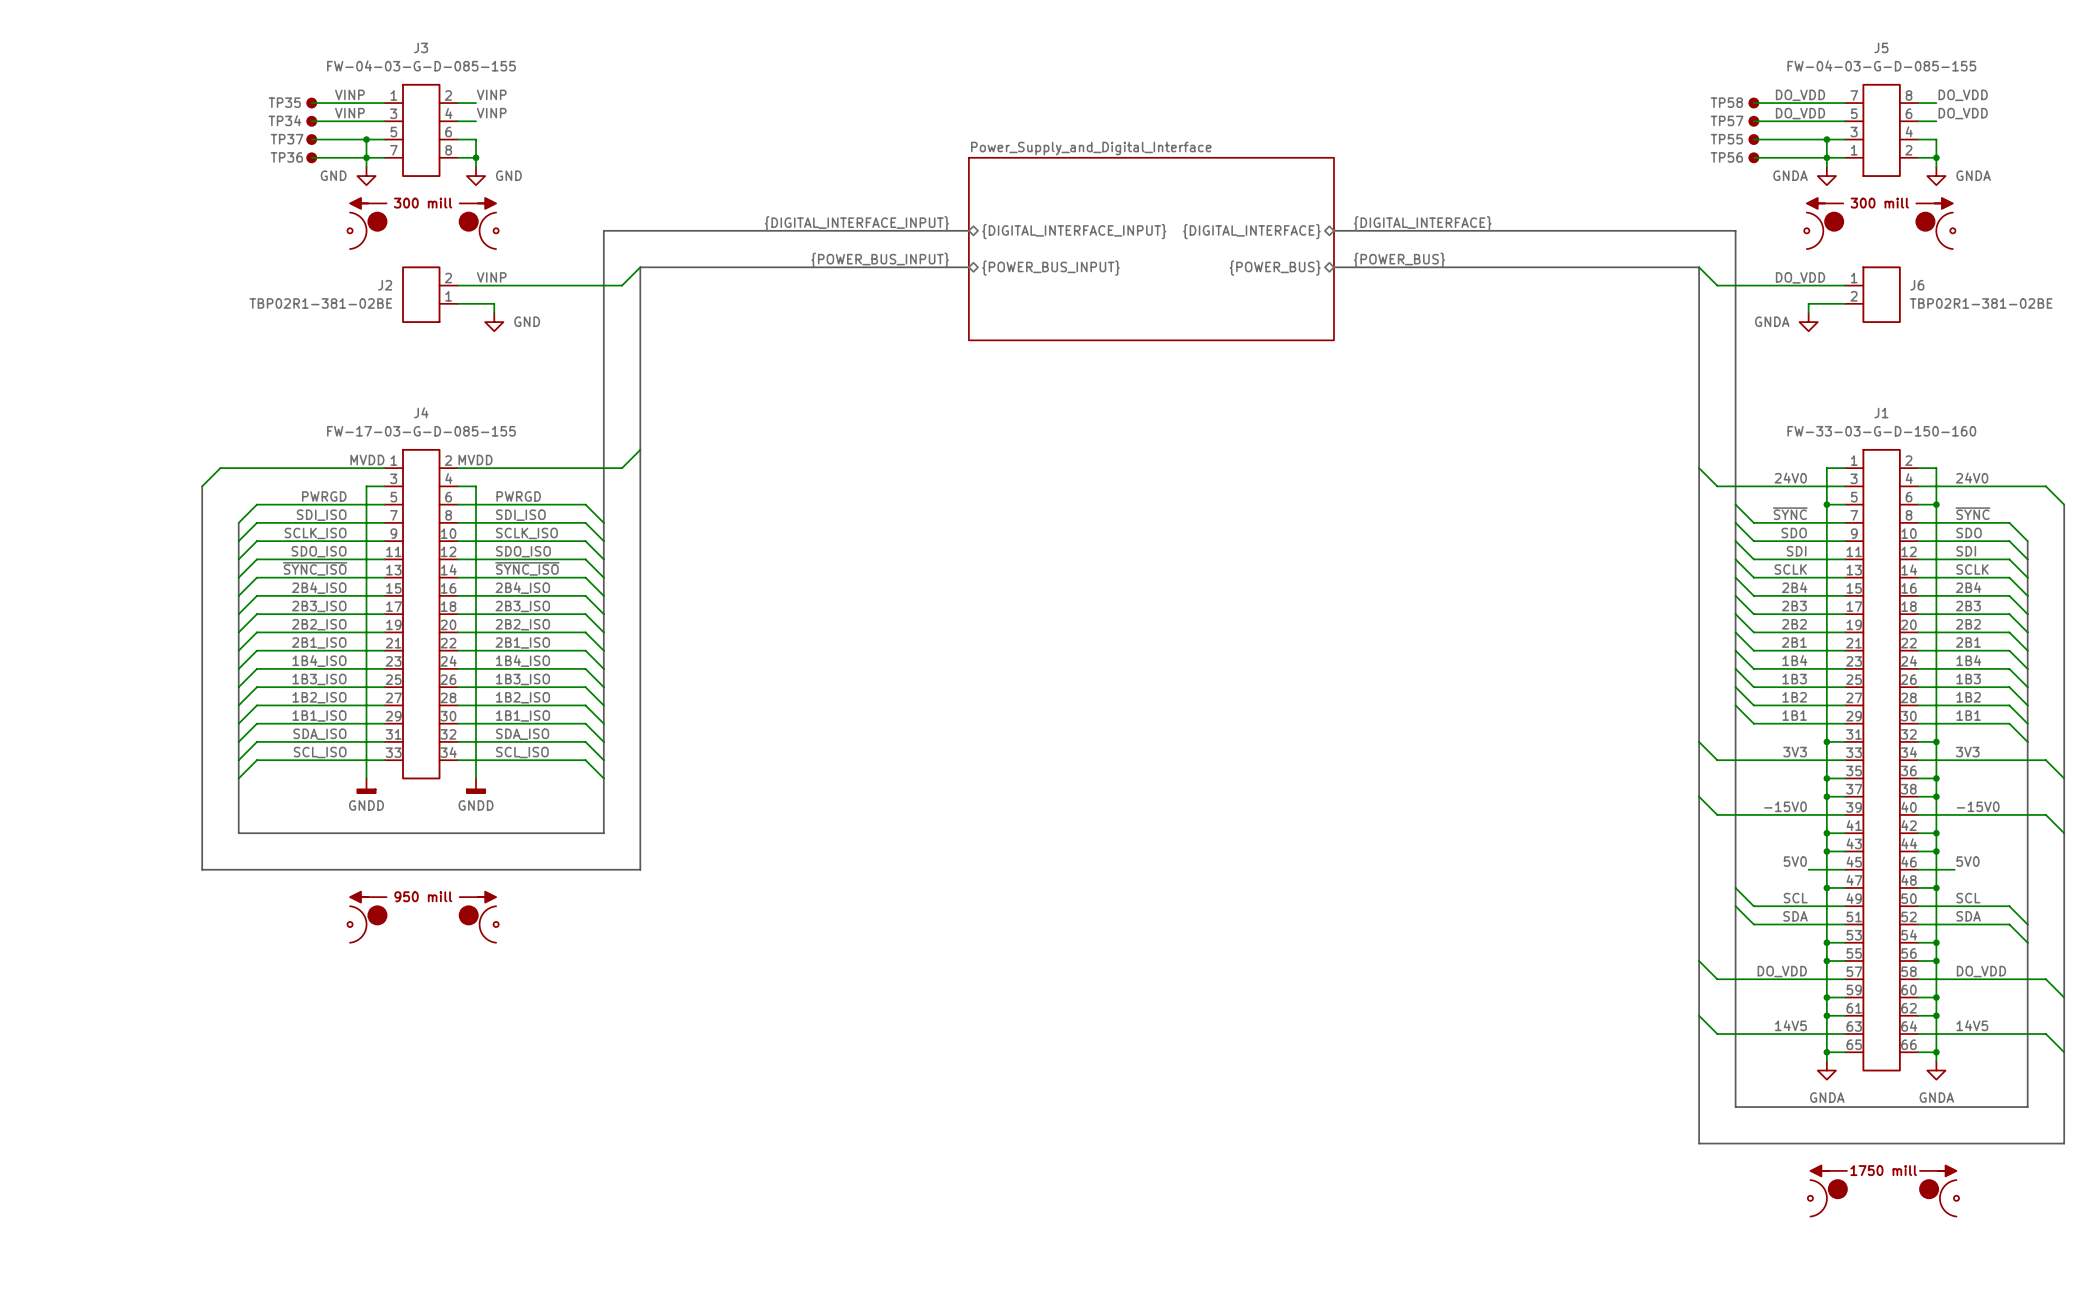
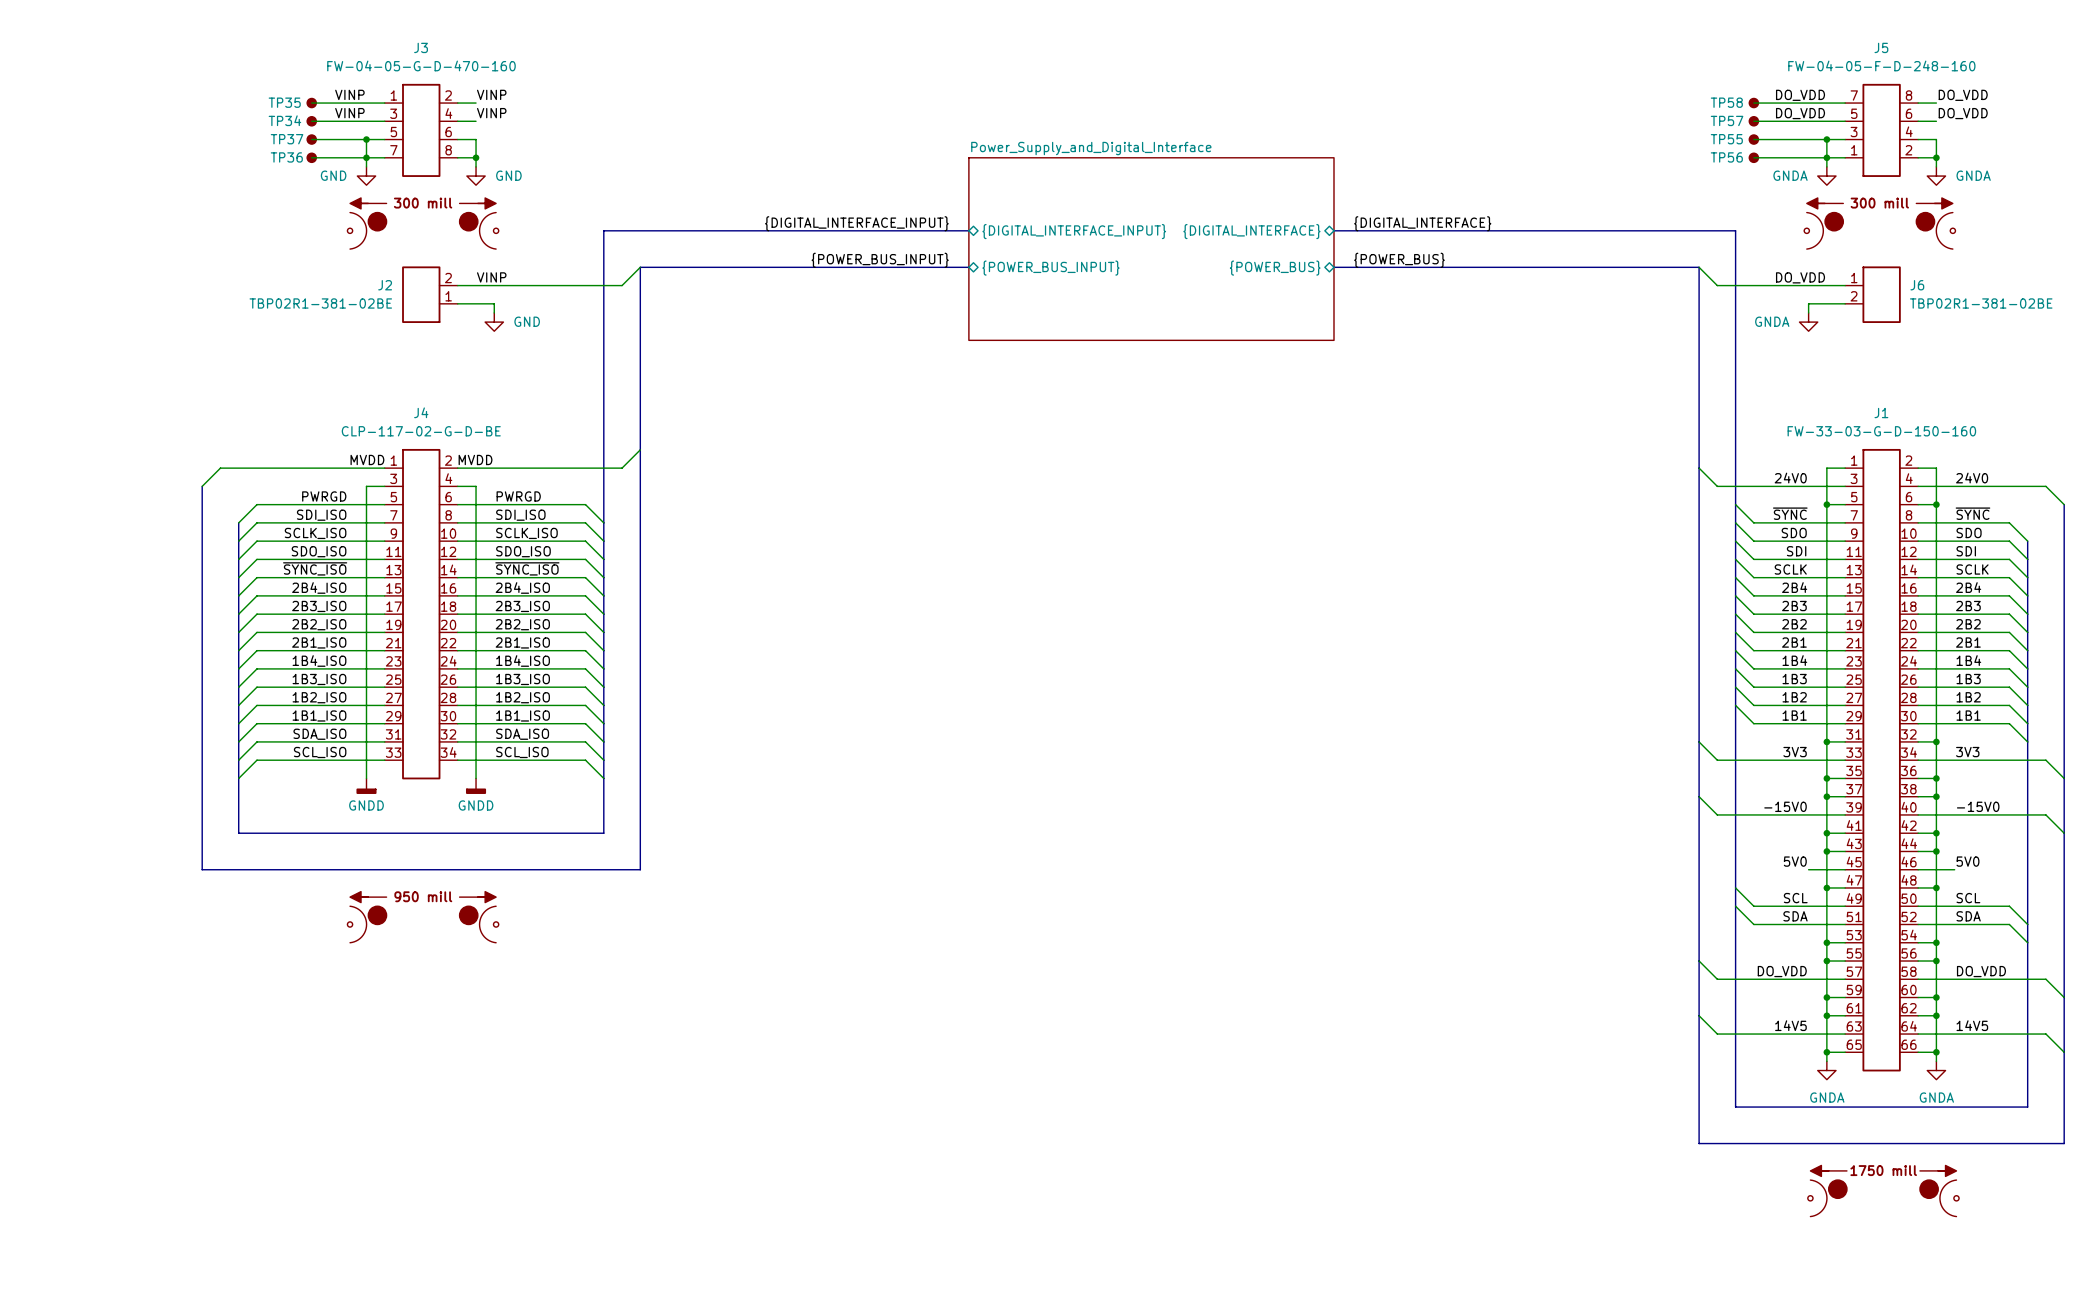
J3 value: FW-04-03-G-D-085-155 (421, 65) -> FW-04-05-G-D-470-160 (421, 65)
J5 value: FW-04-03-G-D-085-155 (1881, 65) -> FW-04-05-F-D-248-160 (1881, 65)
J4 value: FW-17-03-G-D-085-155 (421, 431) -> CLP-117-02-G-D-BE (421, 431)

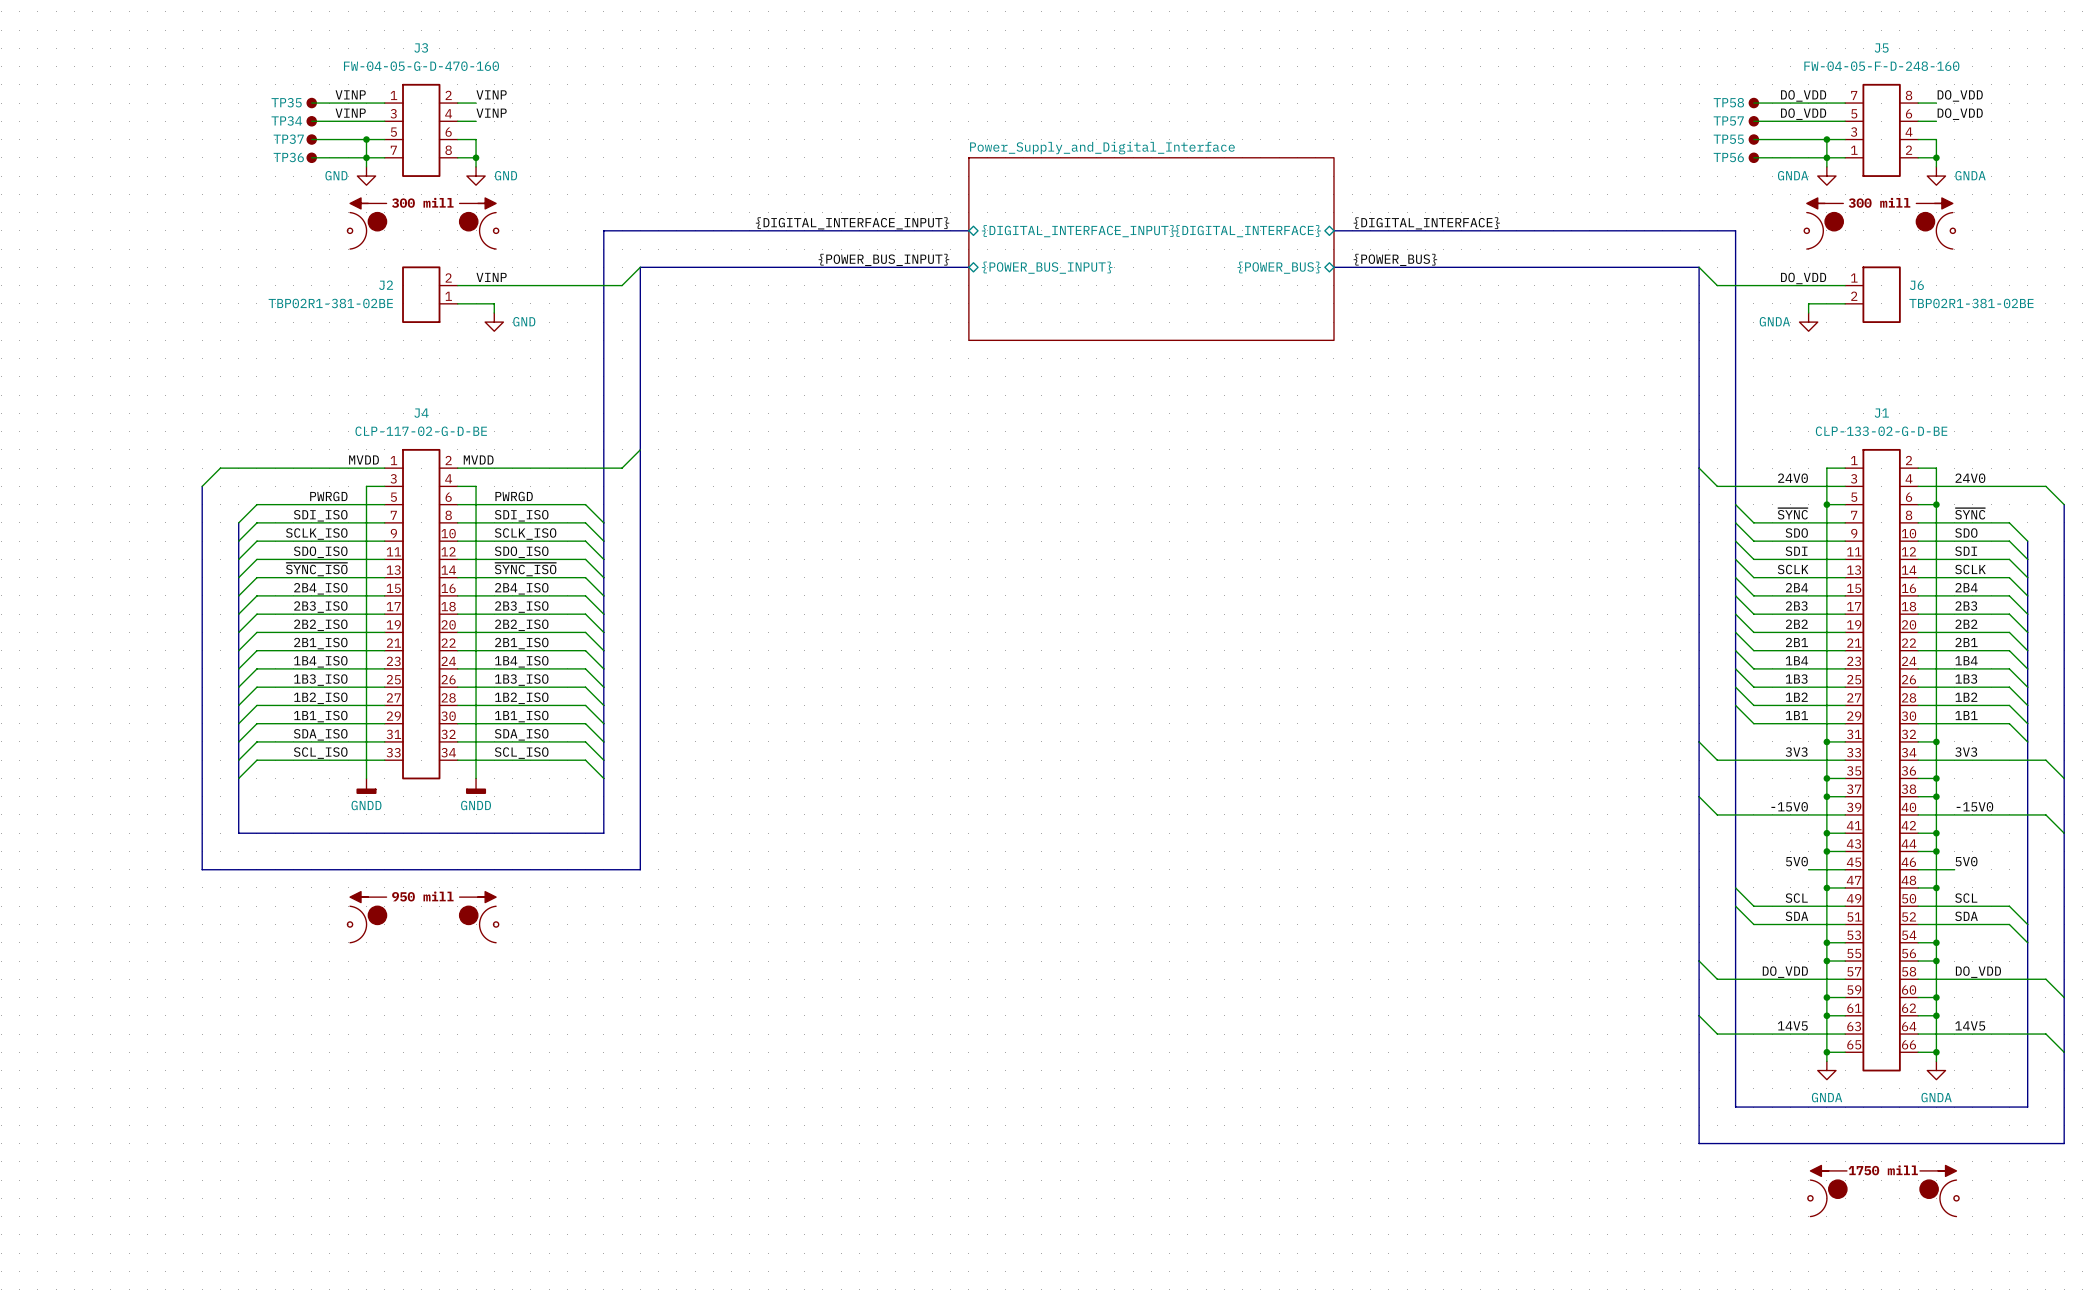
J1 value: FW-33-03-G-D-150-160 (1881, 431) -> CLP-133-02-G-D-BE (1881, 431)

